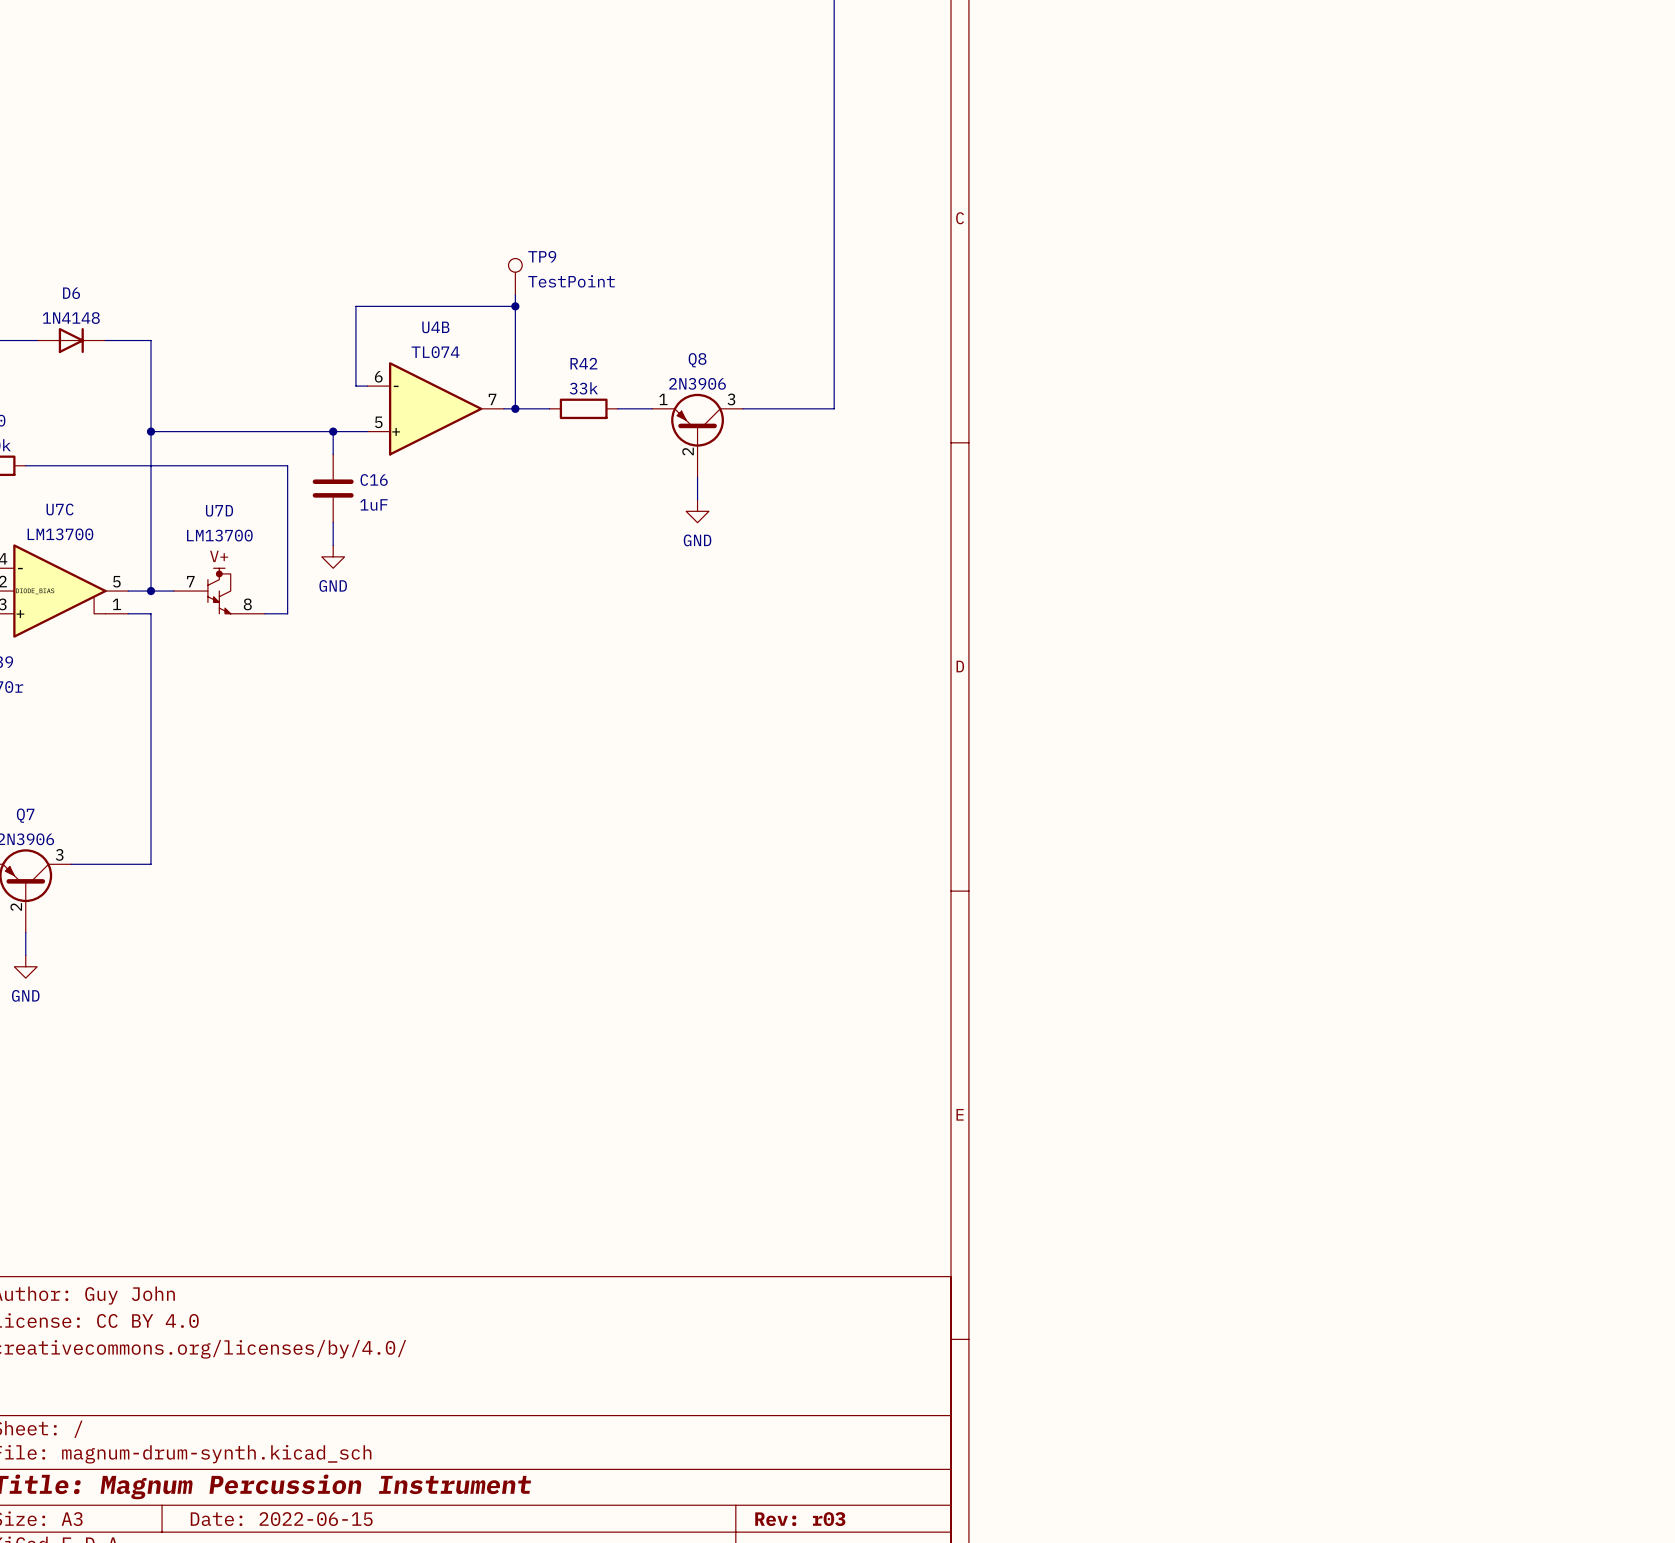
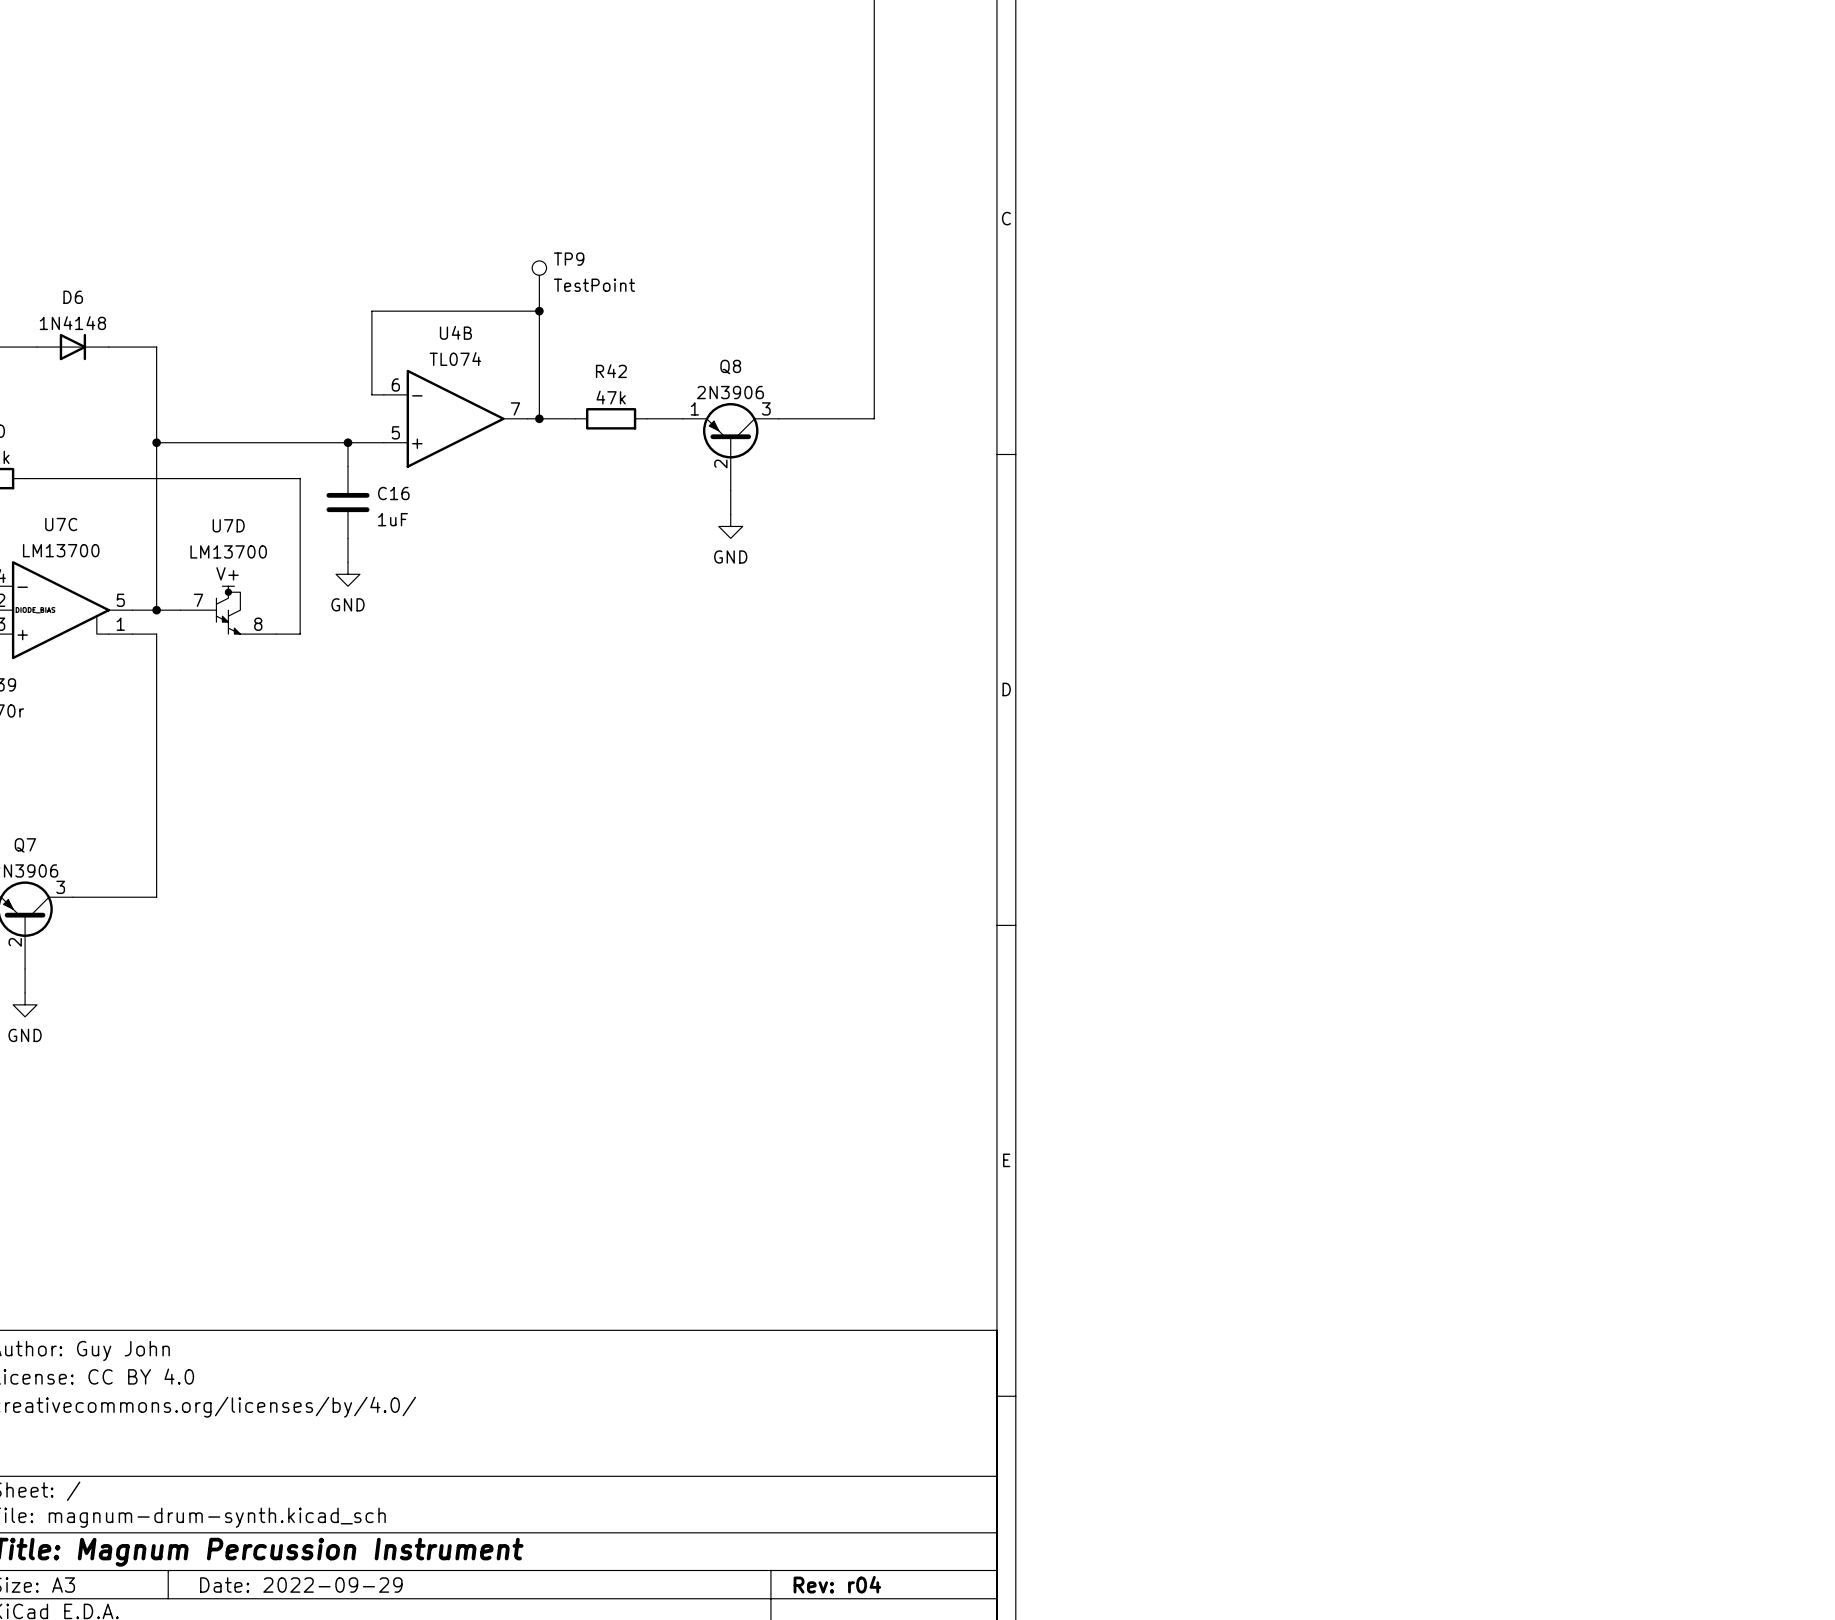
R42 value: 33k (583, 388) -> 47k (611, 397)
title block: Date: 2022-06-15 (281, 1519) -> Date: 2022-09-29 (301, 1585)
title block: Rev: r03 (800, 1519) -> Rev: r04 (837, 1584)

